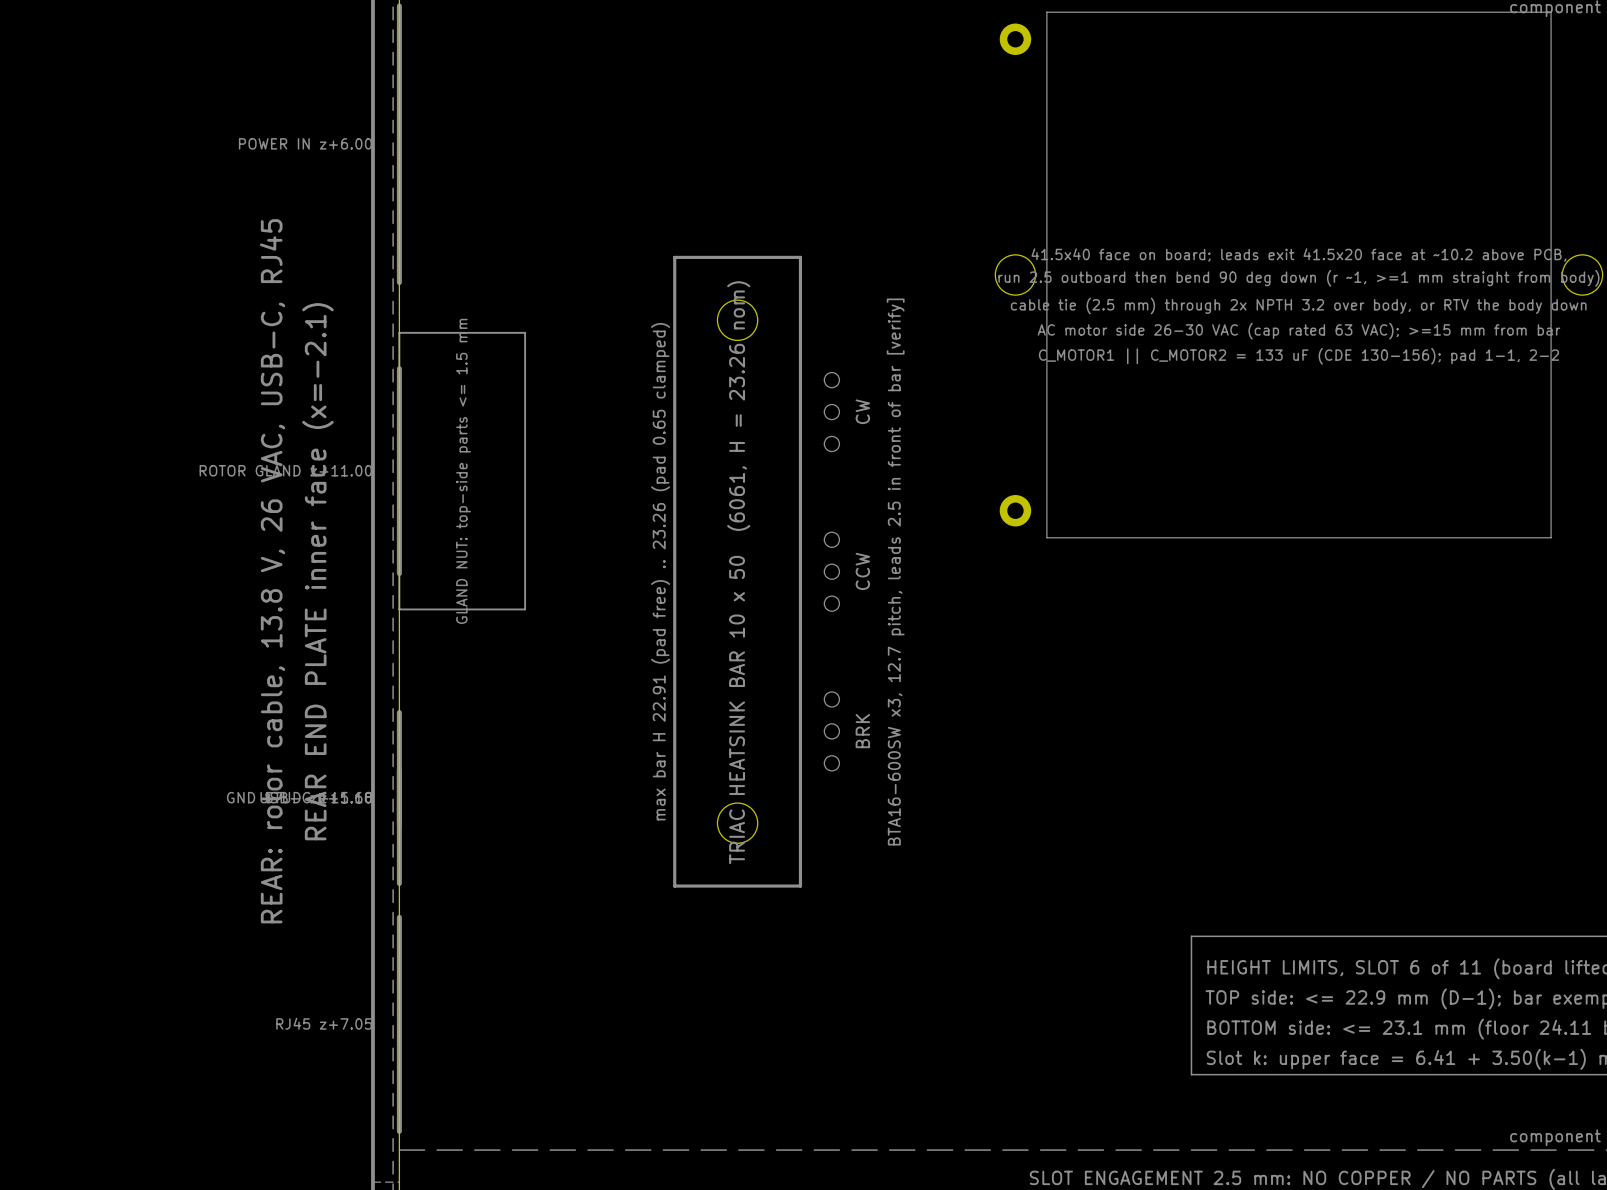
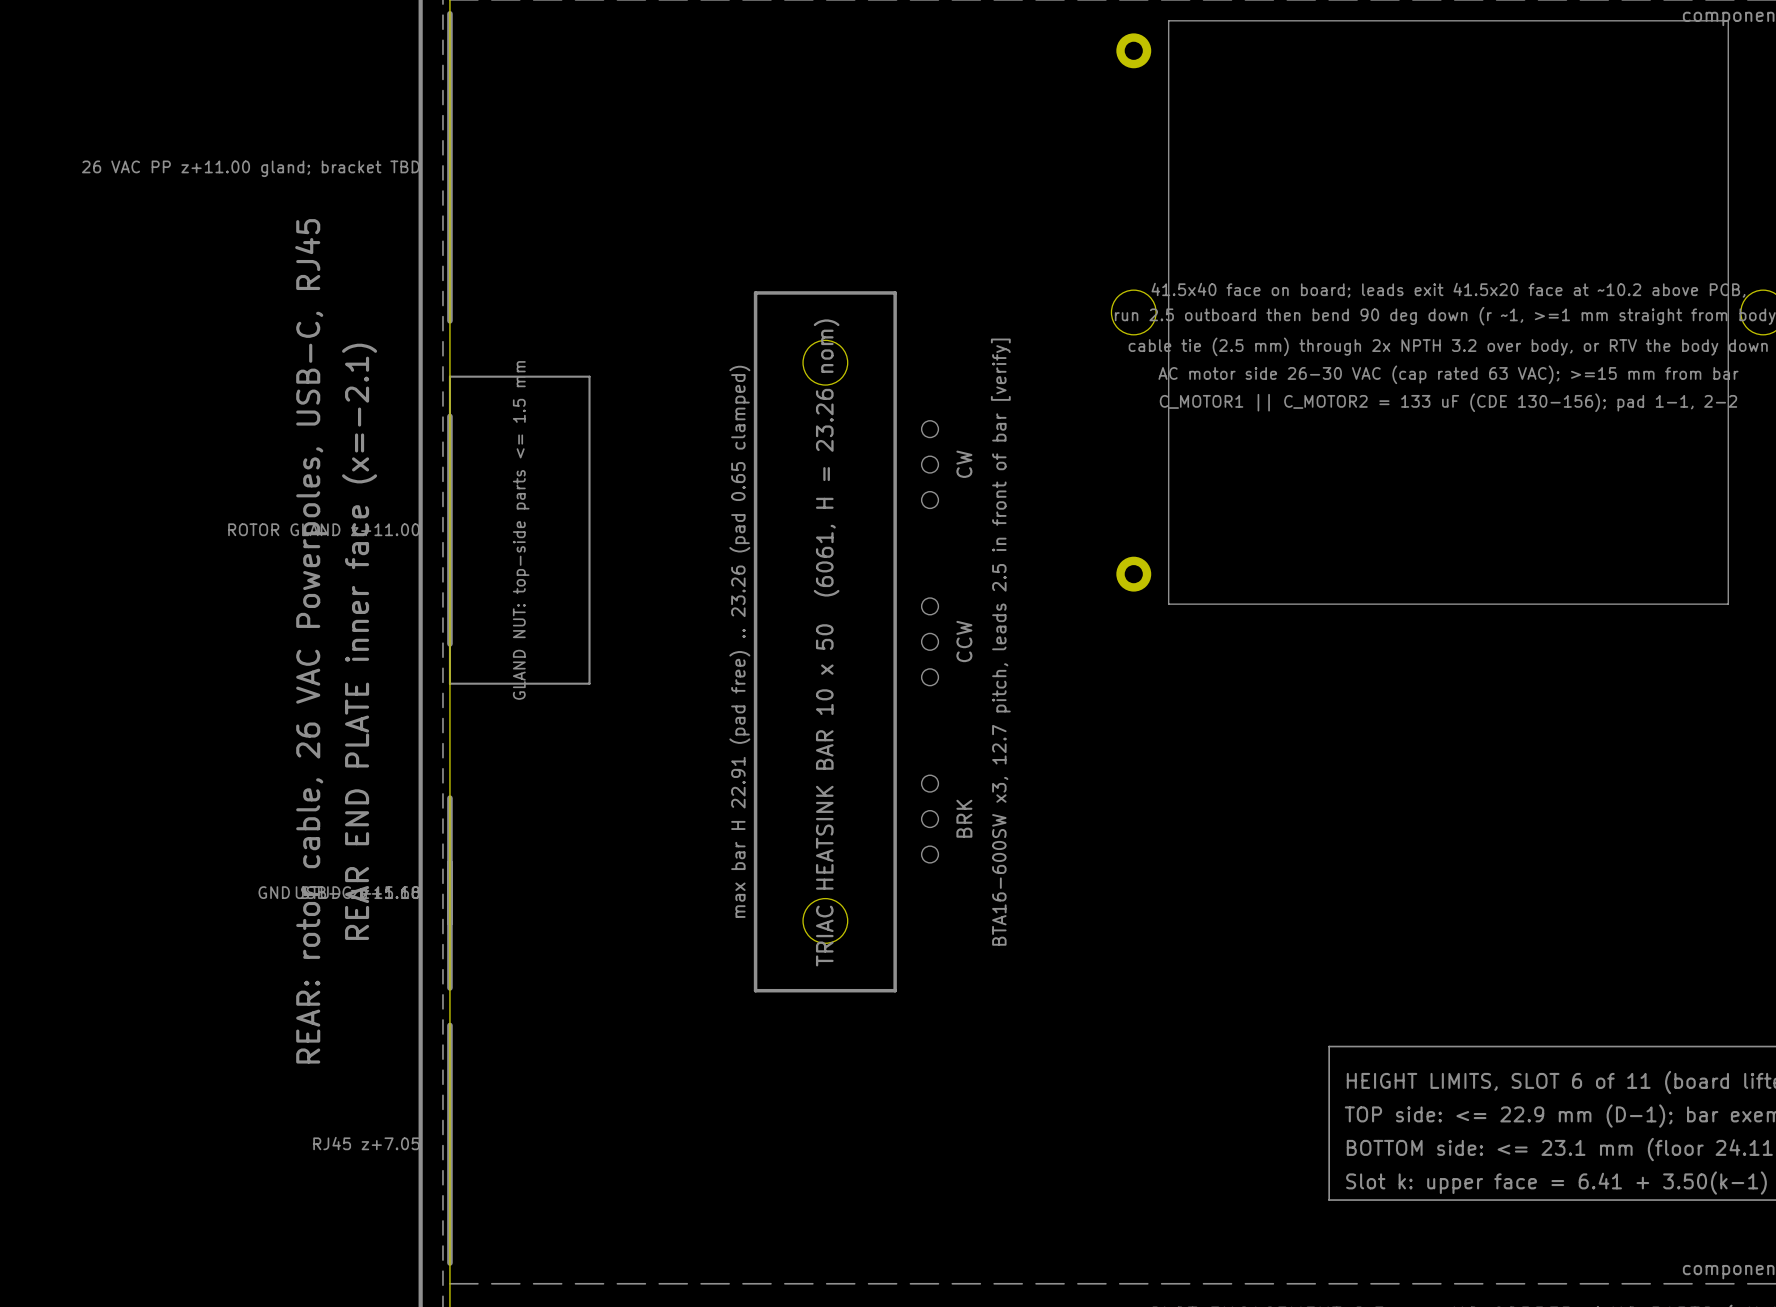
text: POWER IN z+6.00 (305, 143) -> 26 VAC PP z+11.00 gland; bracket TBD (250, 168)
text: REAR: rotor cable, 13.8 V, 26 VAC, USB-C, RJ45 (272, 571) -> REAR: rotor cable, 26 VAC Powerpoles, USB-C, RJ45 (311, 641)

